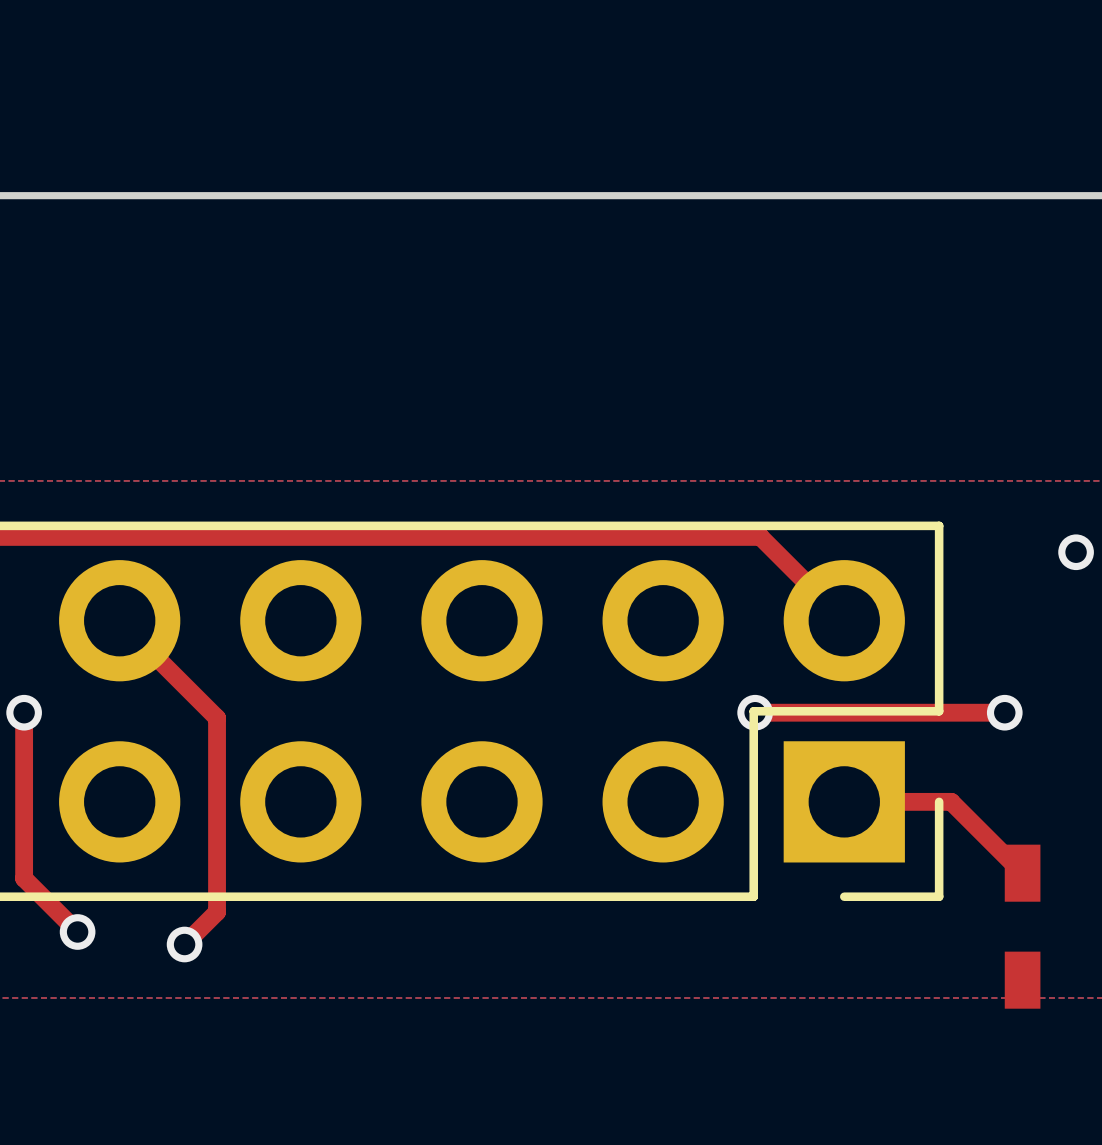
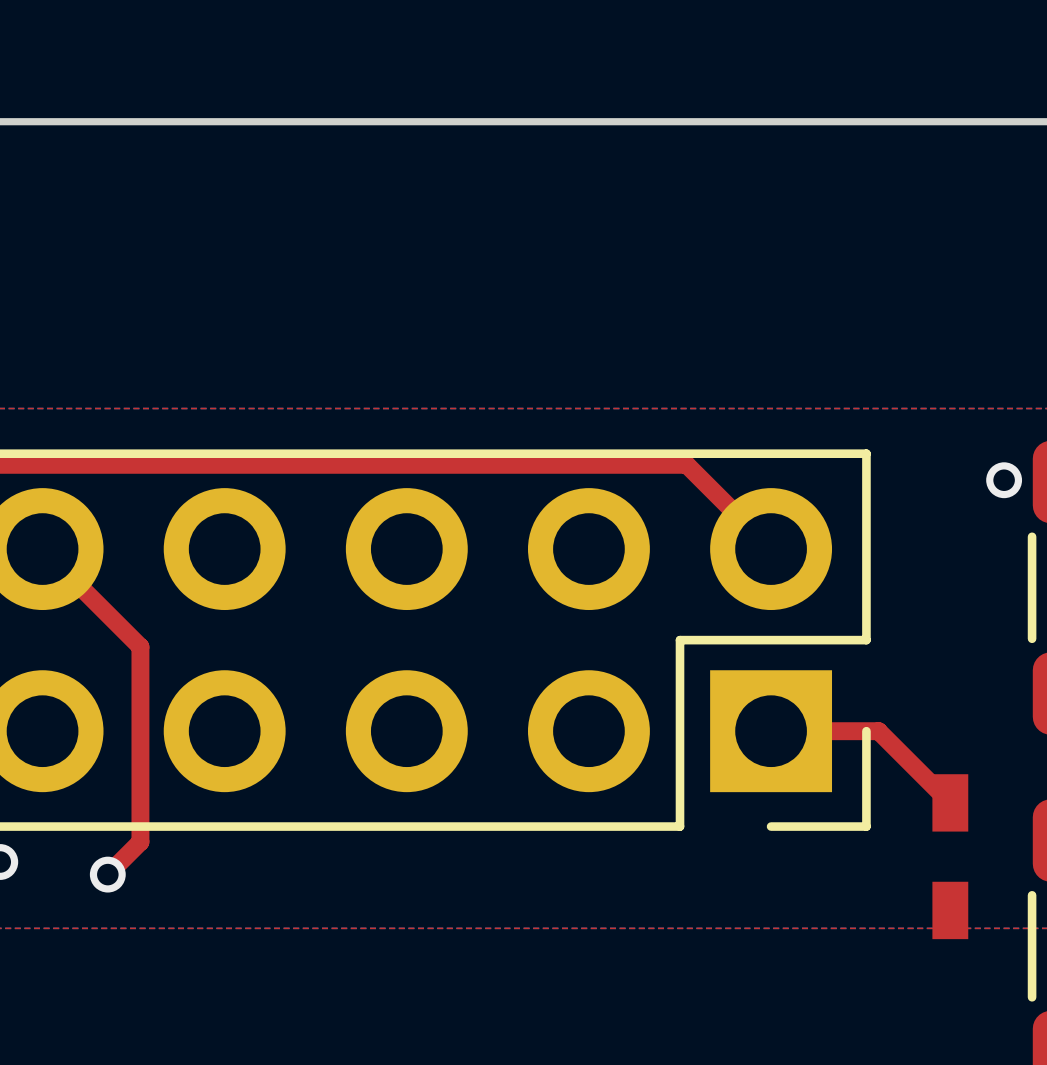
top track: (755, 712) (1004, 712) -> none
via: (755, 712) -> none
via: (1004, 712) -> none

